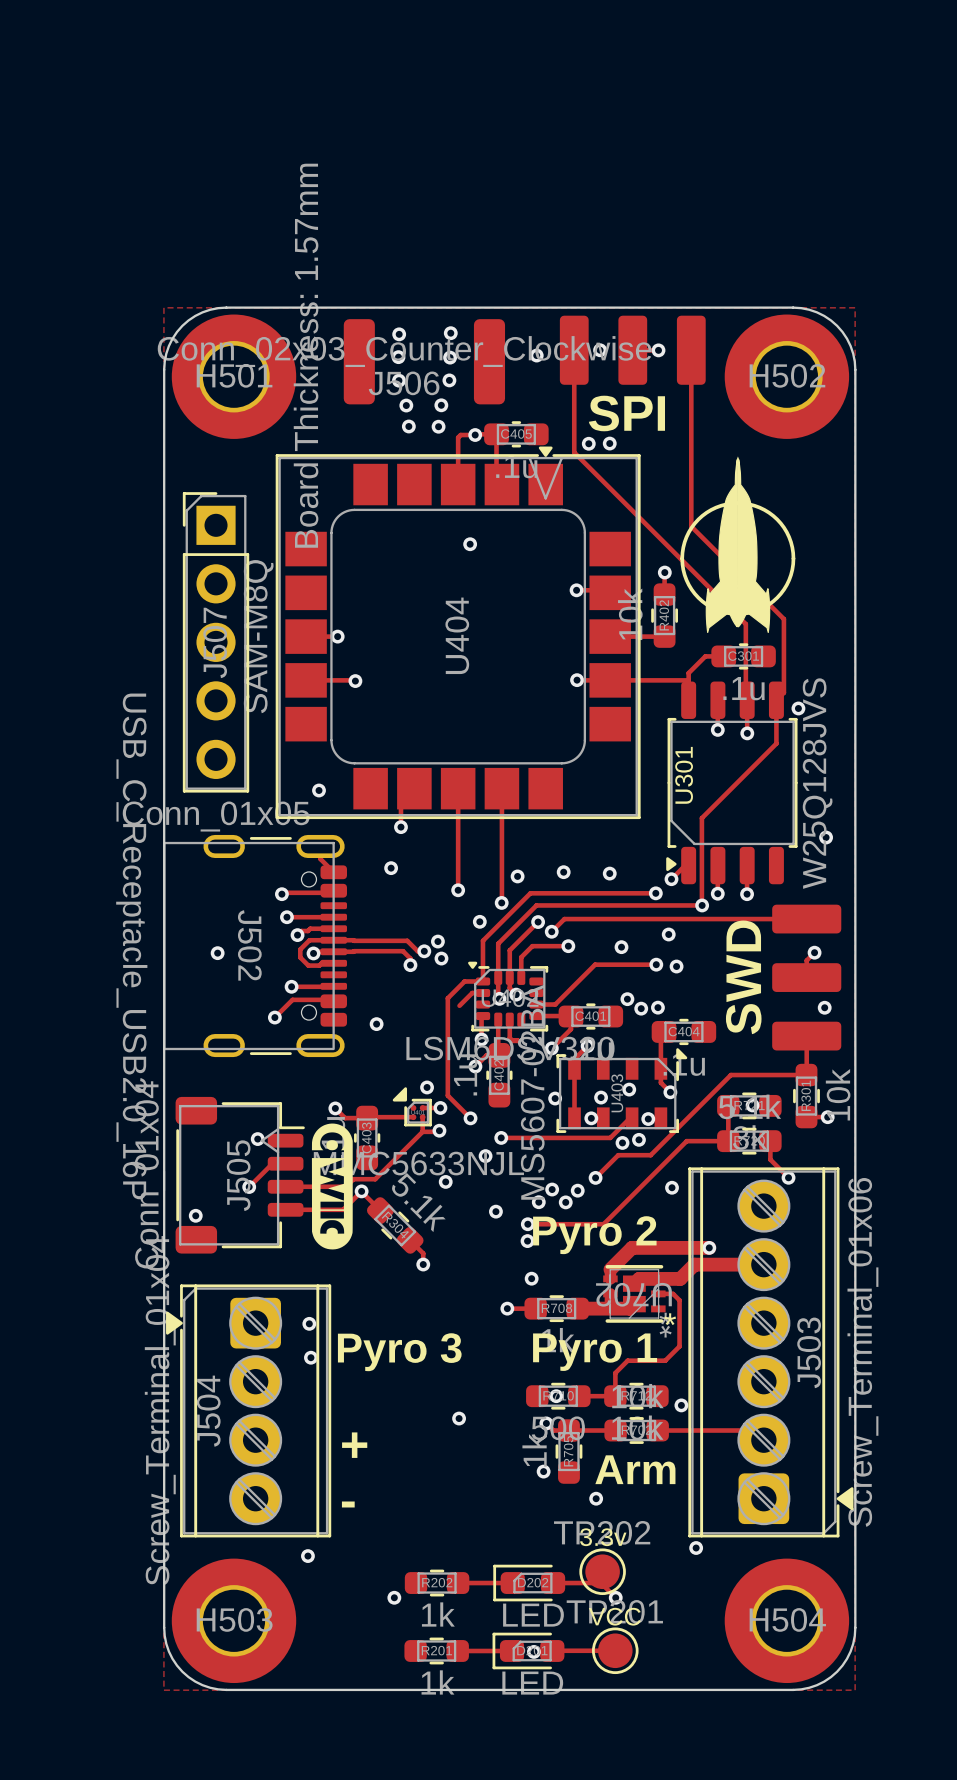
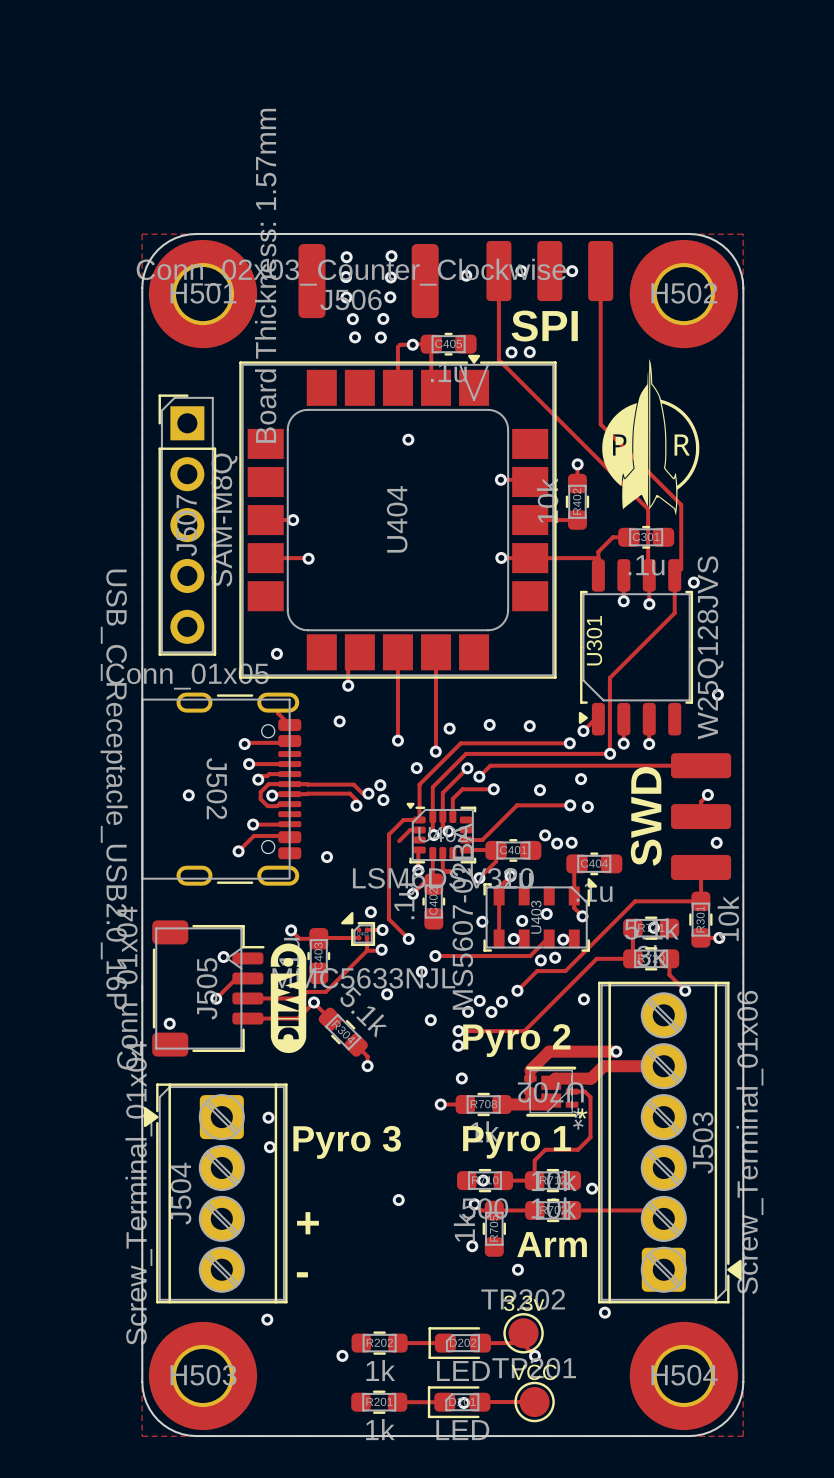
drawing: [705, 456, 740, 634] -> none
drawing shape: [737, 459, 771, 634] -> [602, 359, 700, 516]
line: (737, 503) (716, 507) (698, 519) (686, 537) (682, 558) (686, 580) (698, 597) (716, 609) (737, 613) -> none
line: (738, 503) (759, 507) (777, 519) (789, 537) (793, 558) (789, 580) (777, 597) (759, 609) (738, 613) -> none

